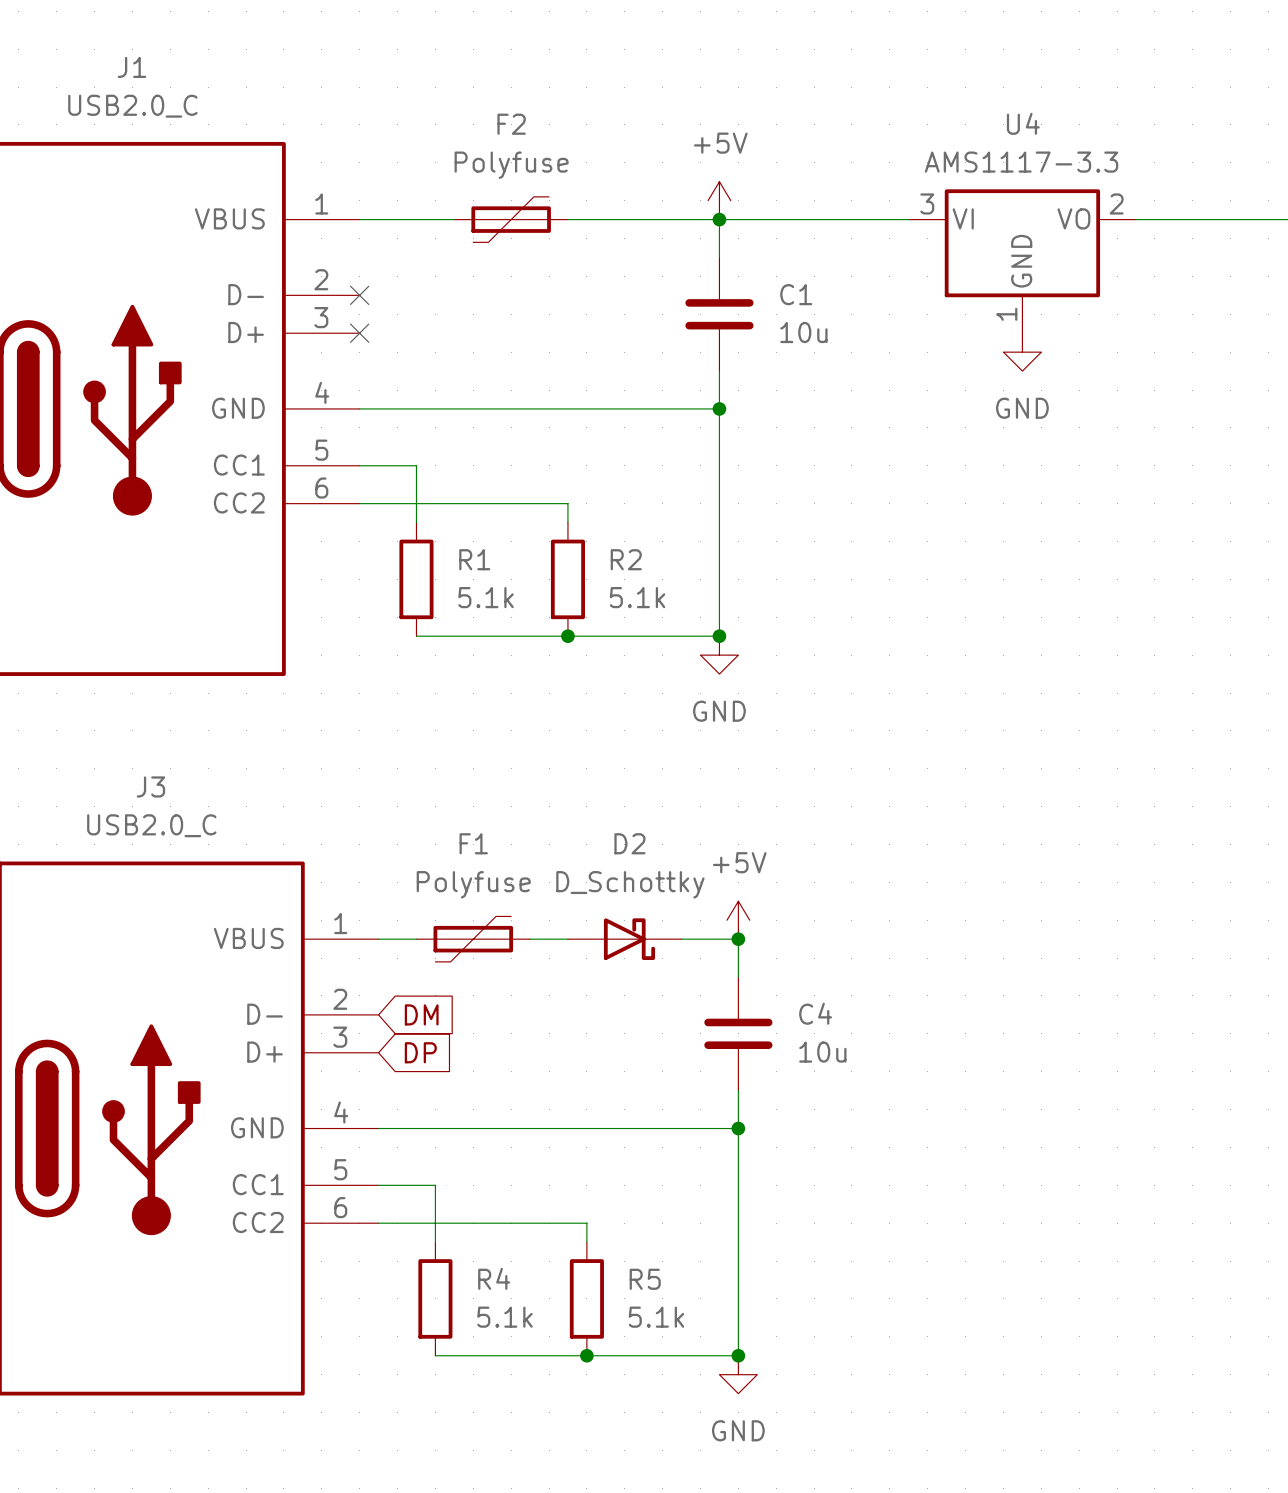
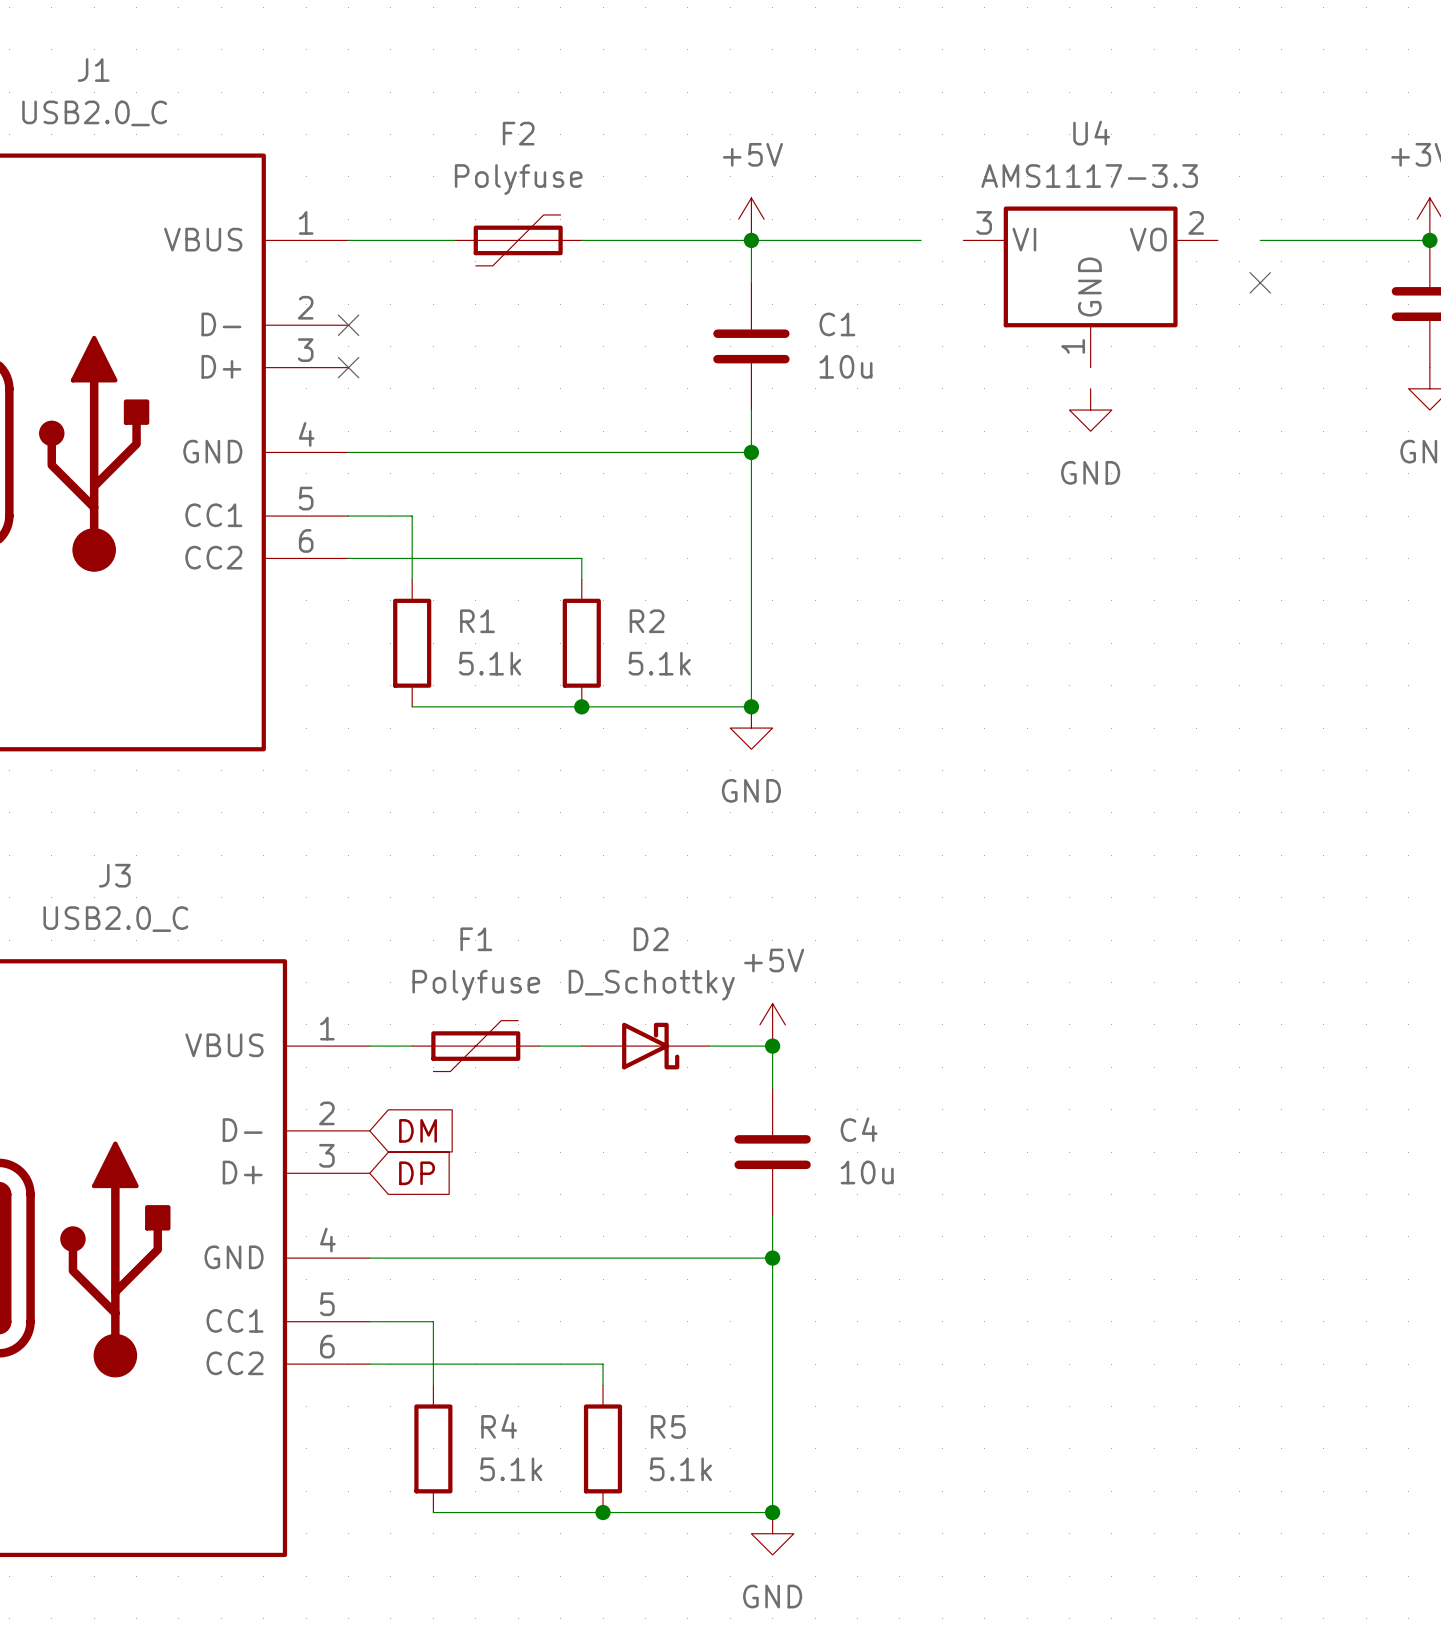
wire: (870, 219) (908, 219) -> none
wire: (1136, 219) (1173, 219) -> none
no-connect mark: none -> (1260, 282)
power symbol position: GND (1022, 352) -> GND (1090, 410)

